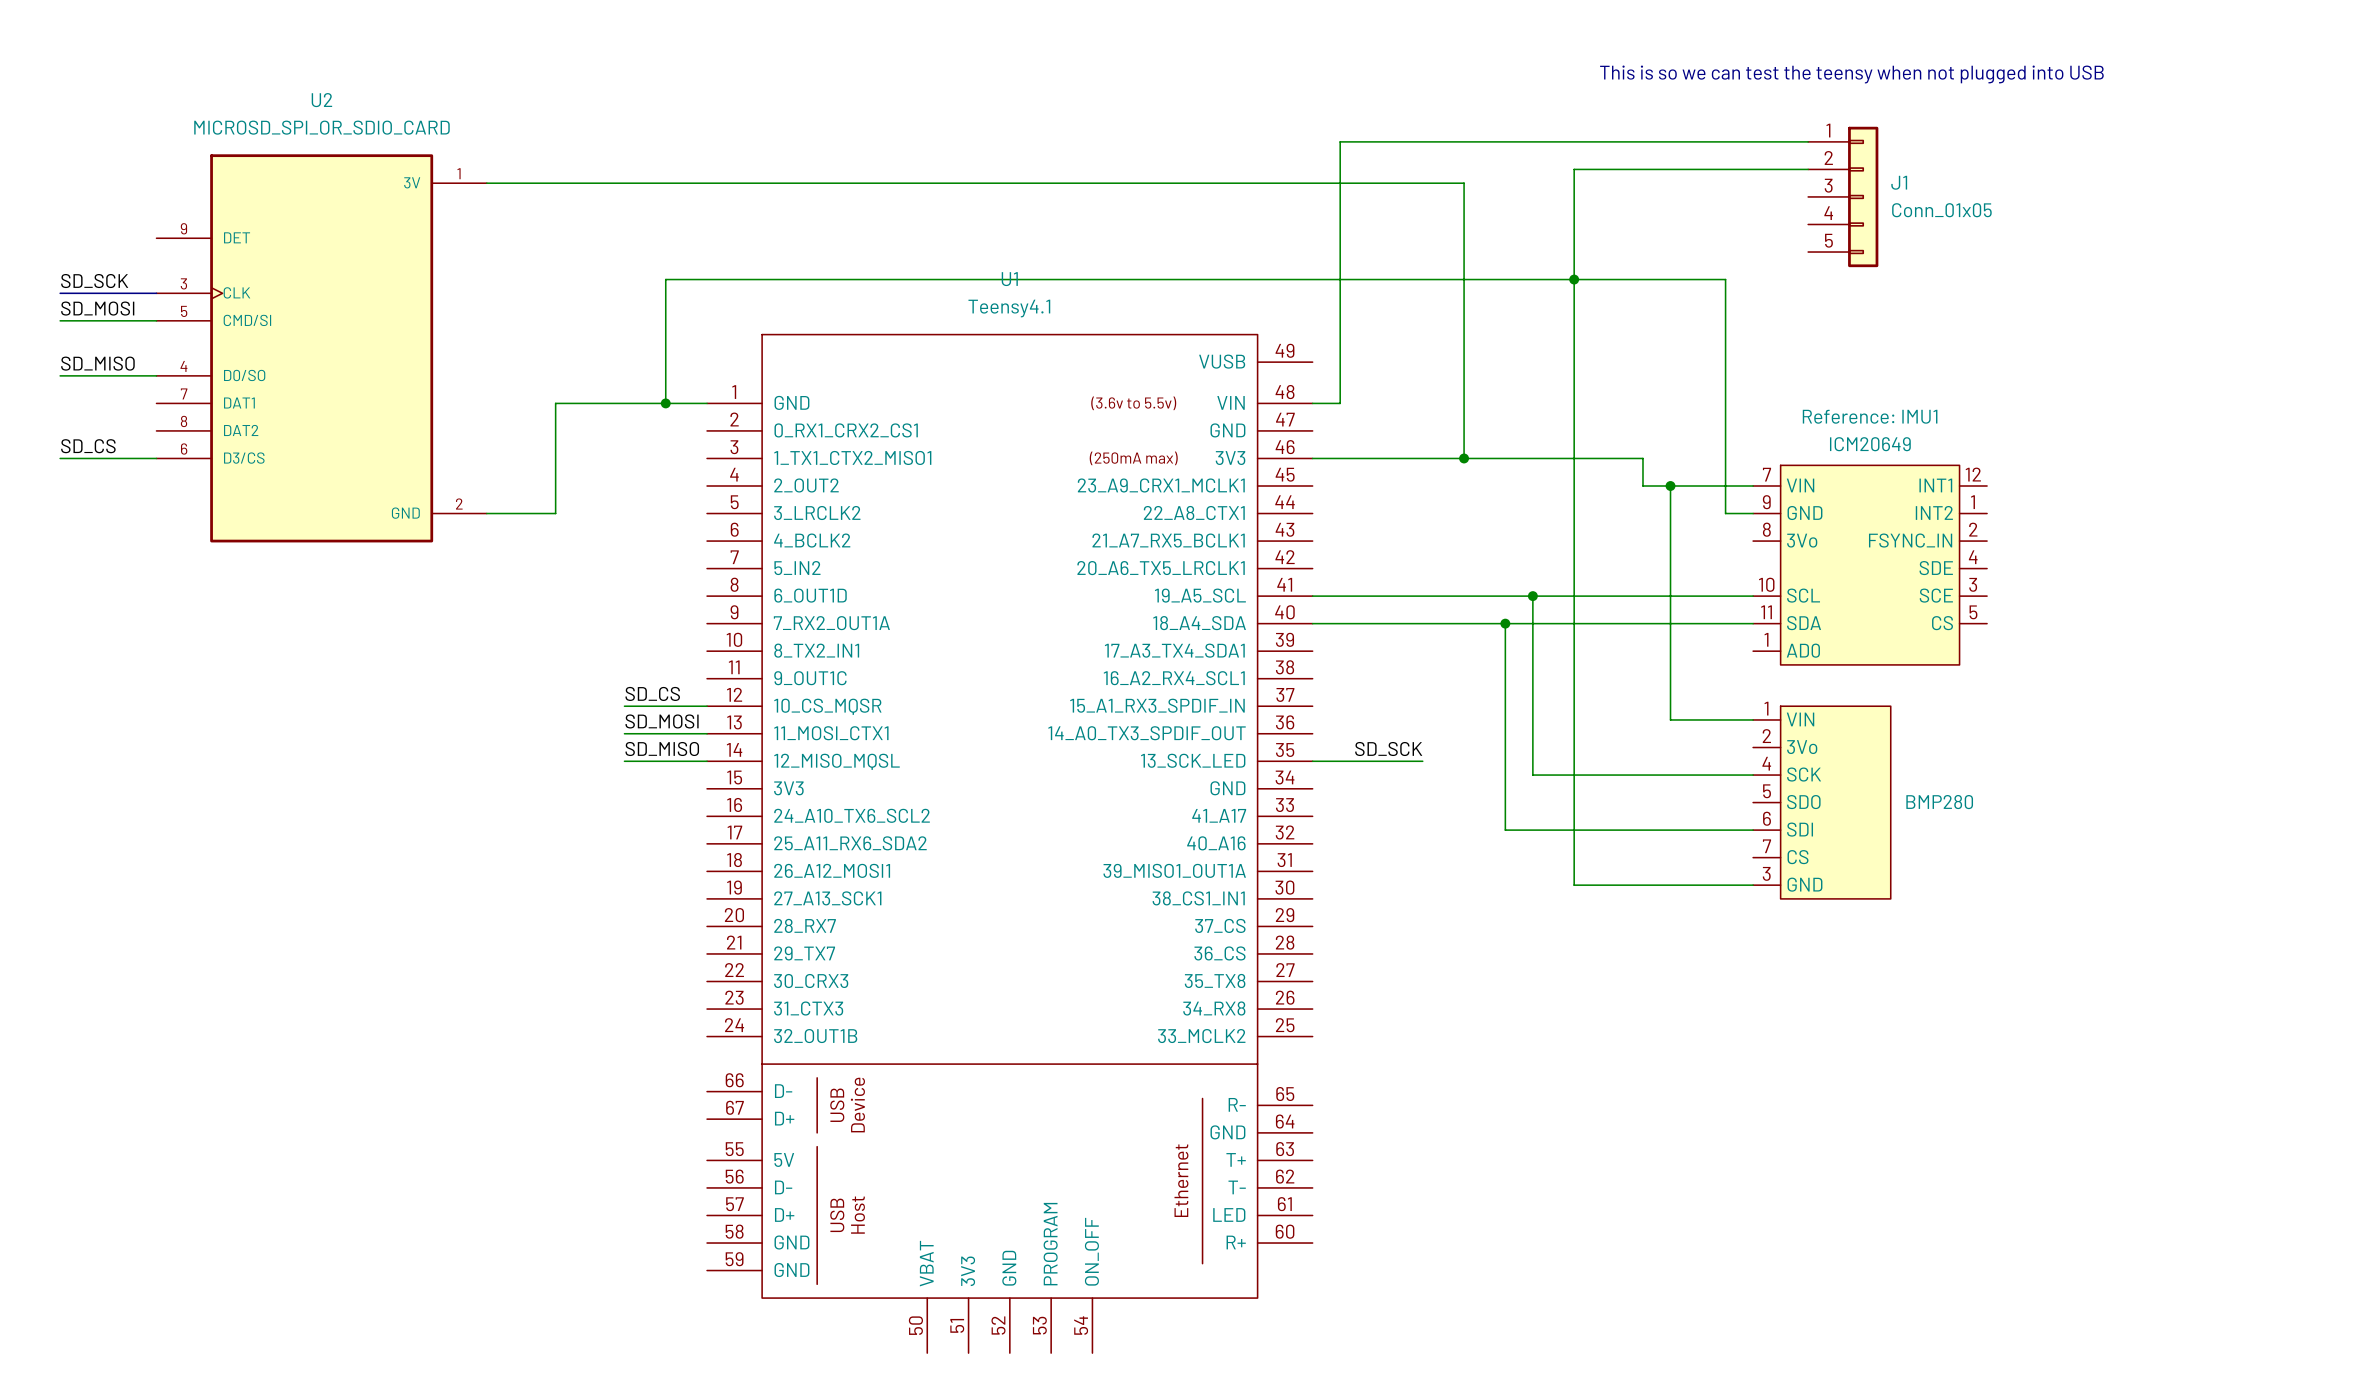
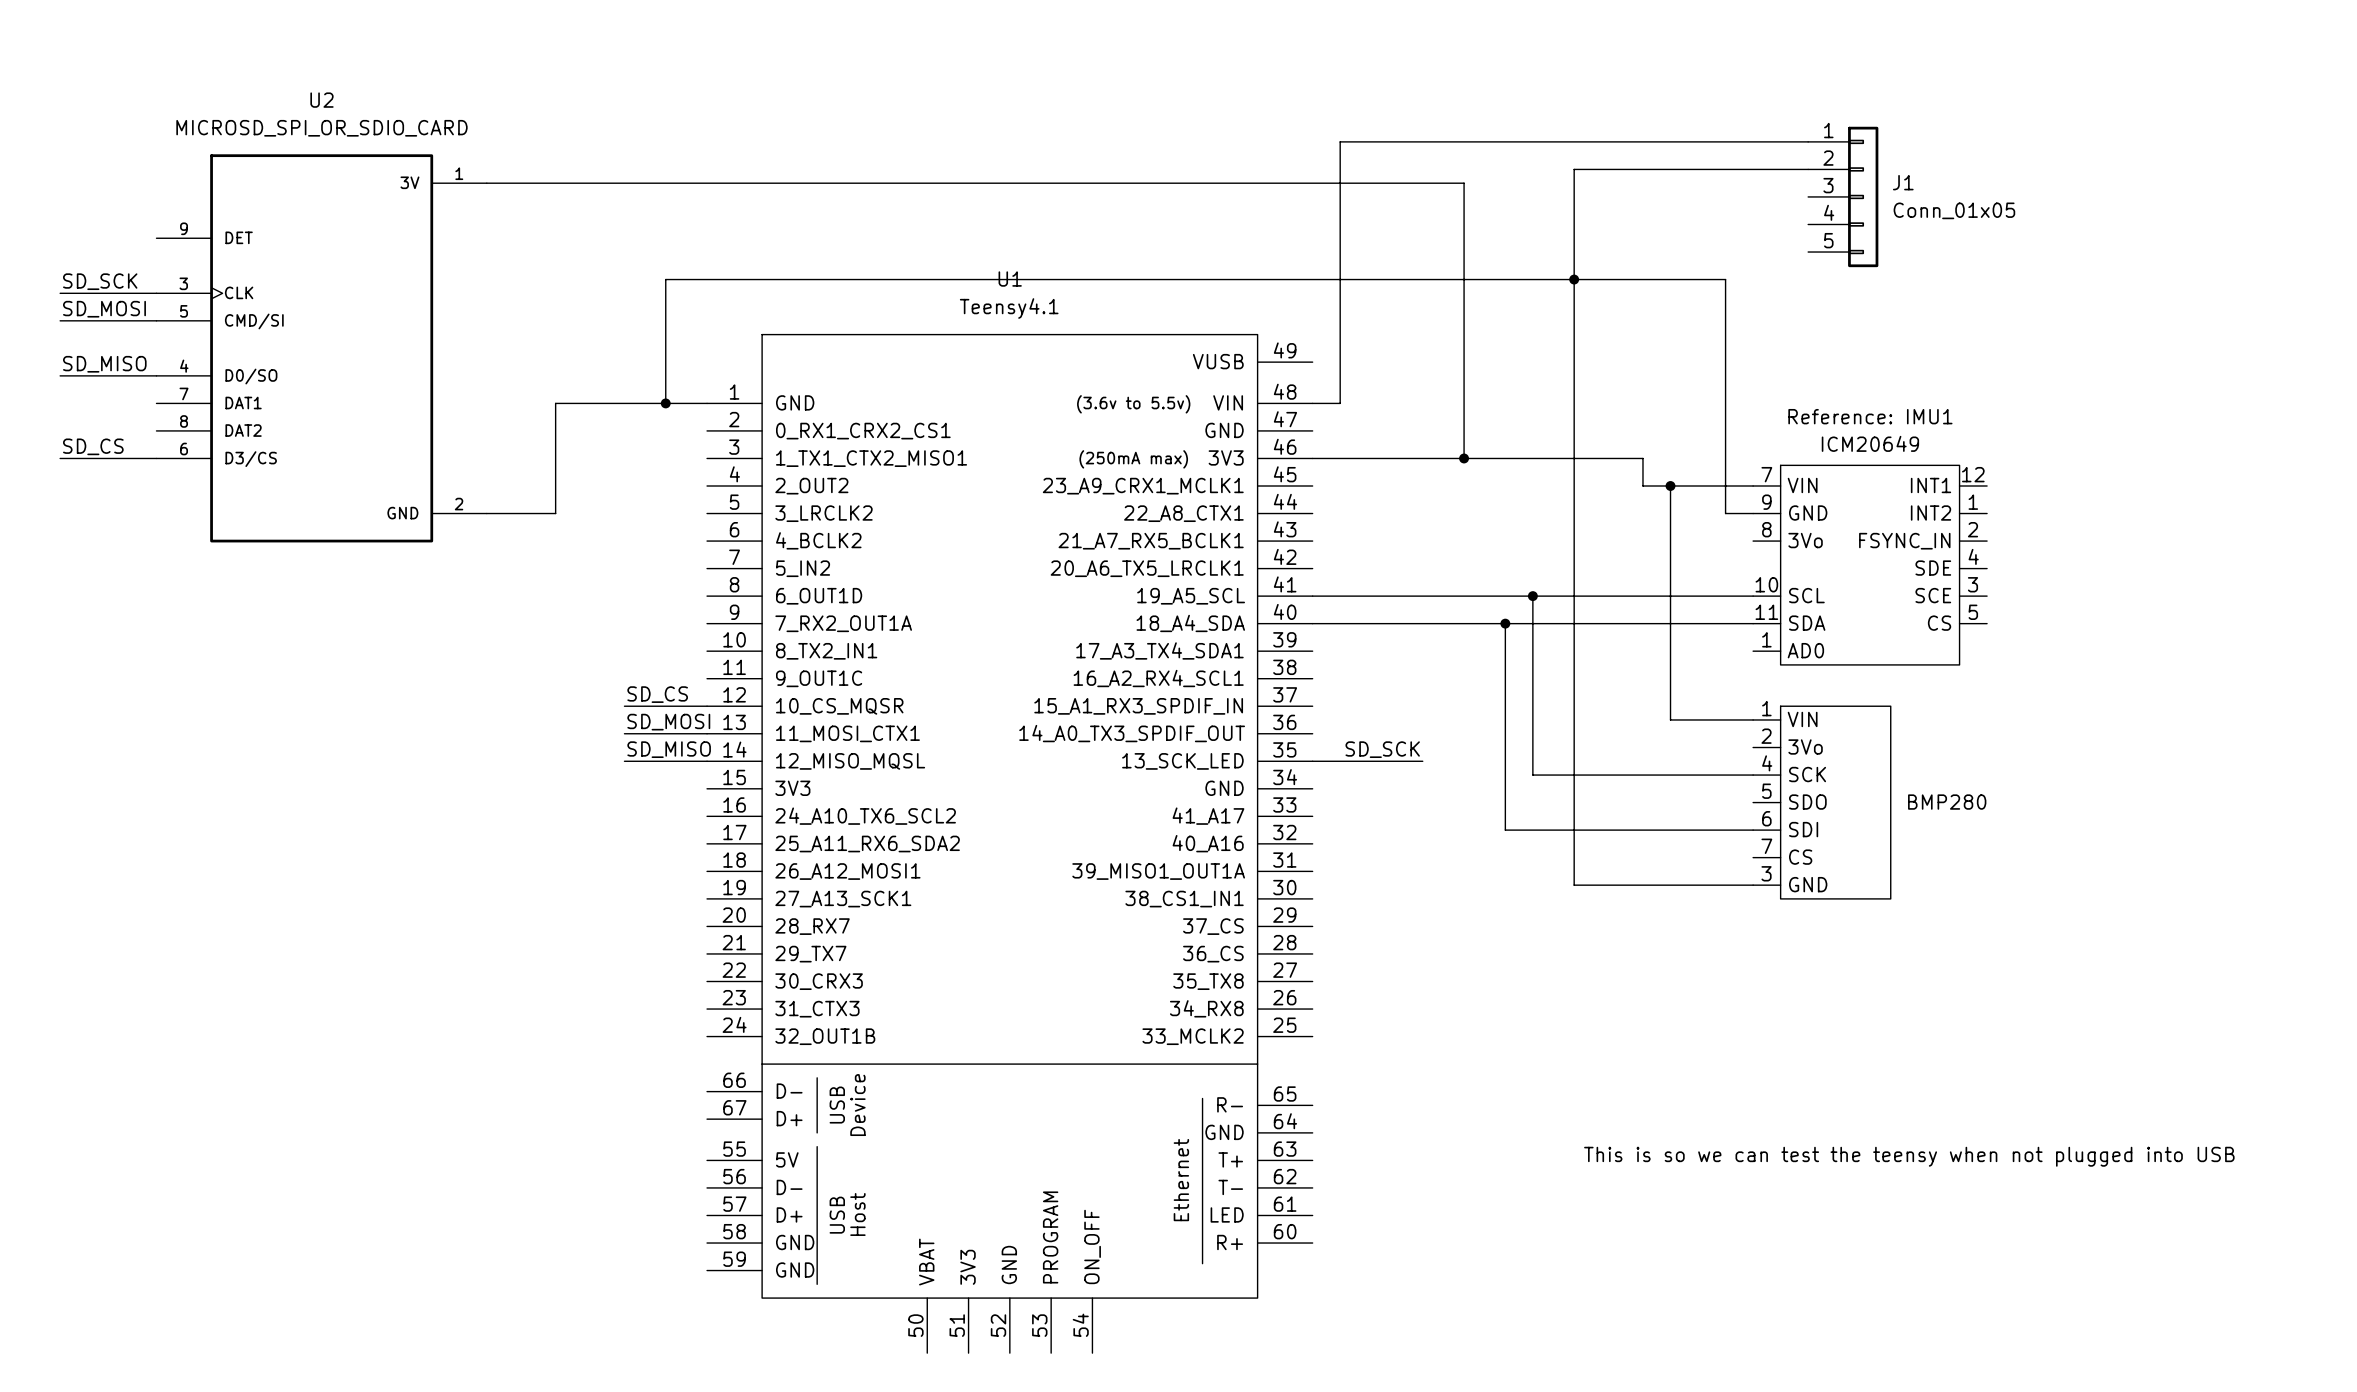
text: This is so we can test the teensy when not plugged into USB (1851, 74) -> none
text: none -> This is so we can test the teensy when not plugged into USB (1909, 1156)

